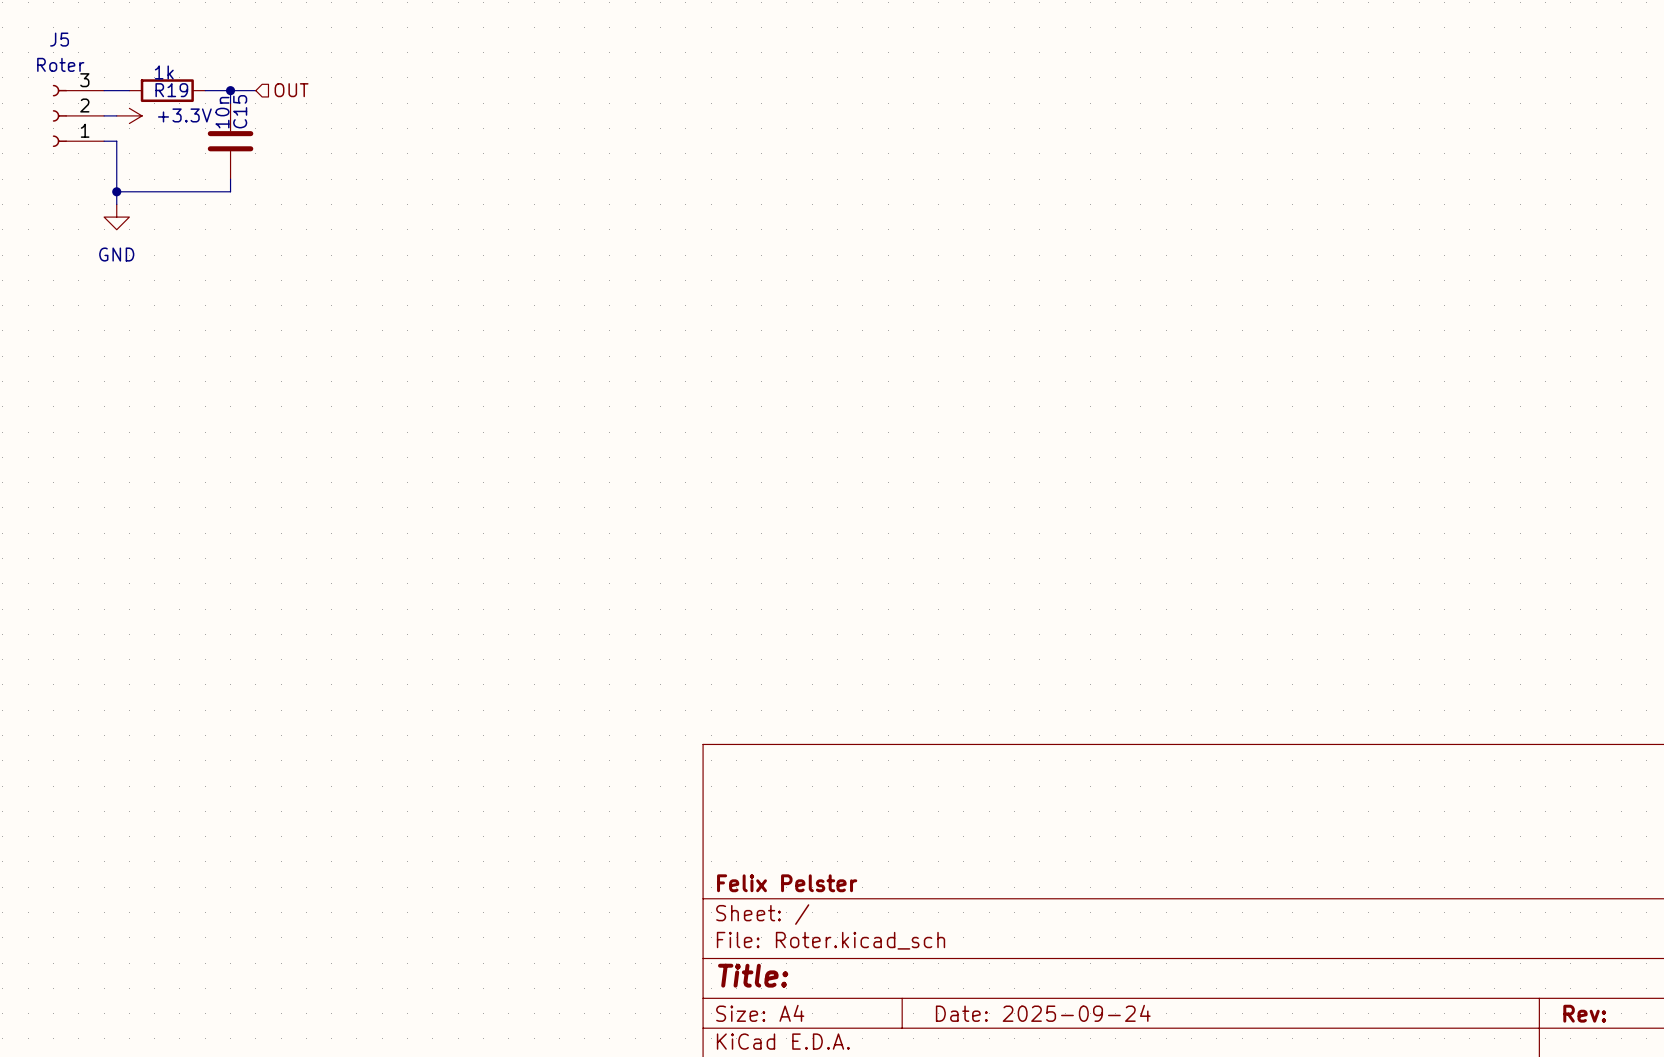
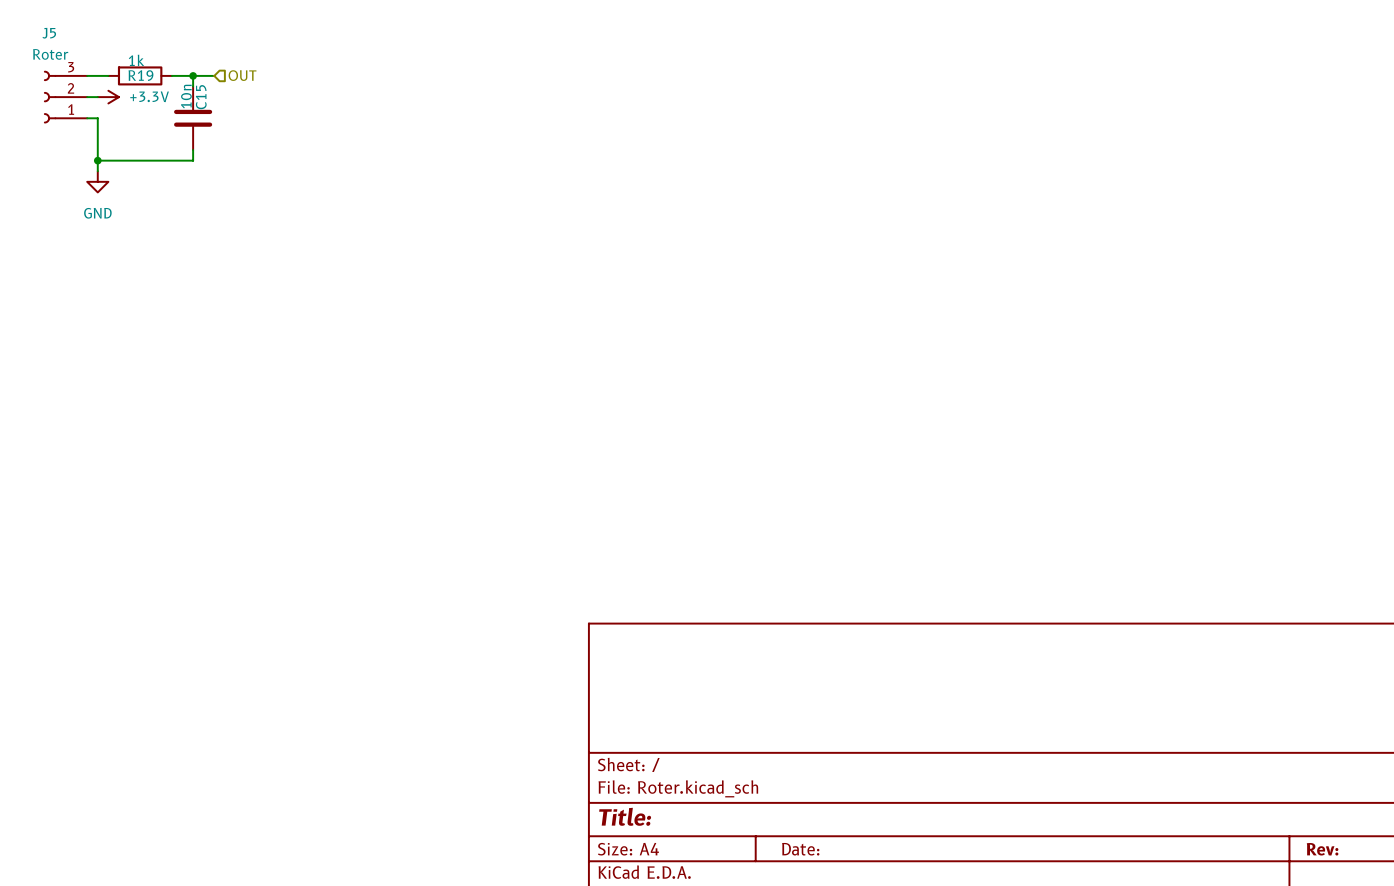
title block: Felix Pelster (787, 883) -> none
title block: Date: 2025-09-24 (1043, 1013) -> Date: (800, 849)

